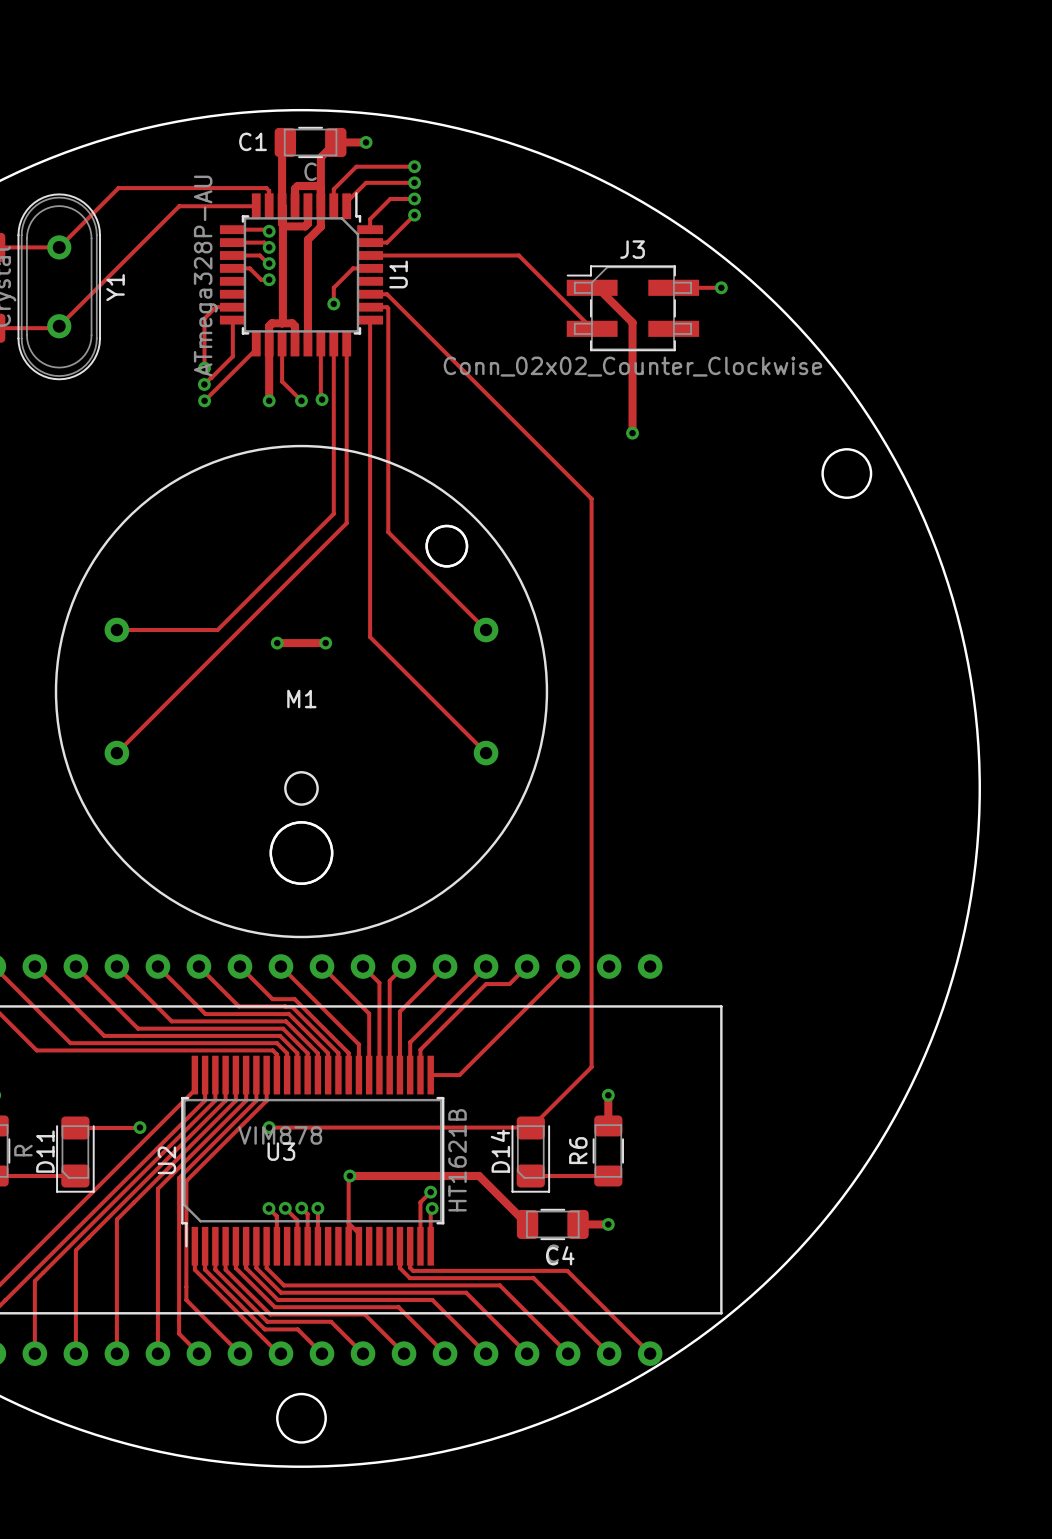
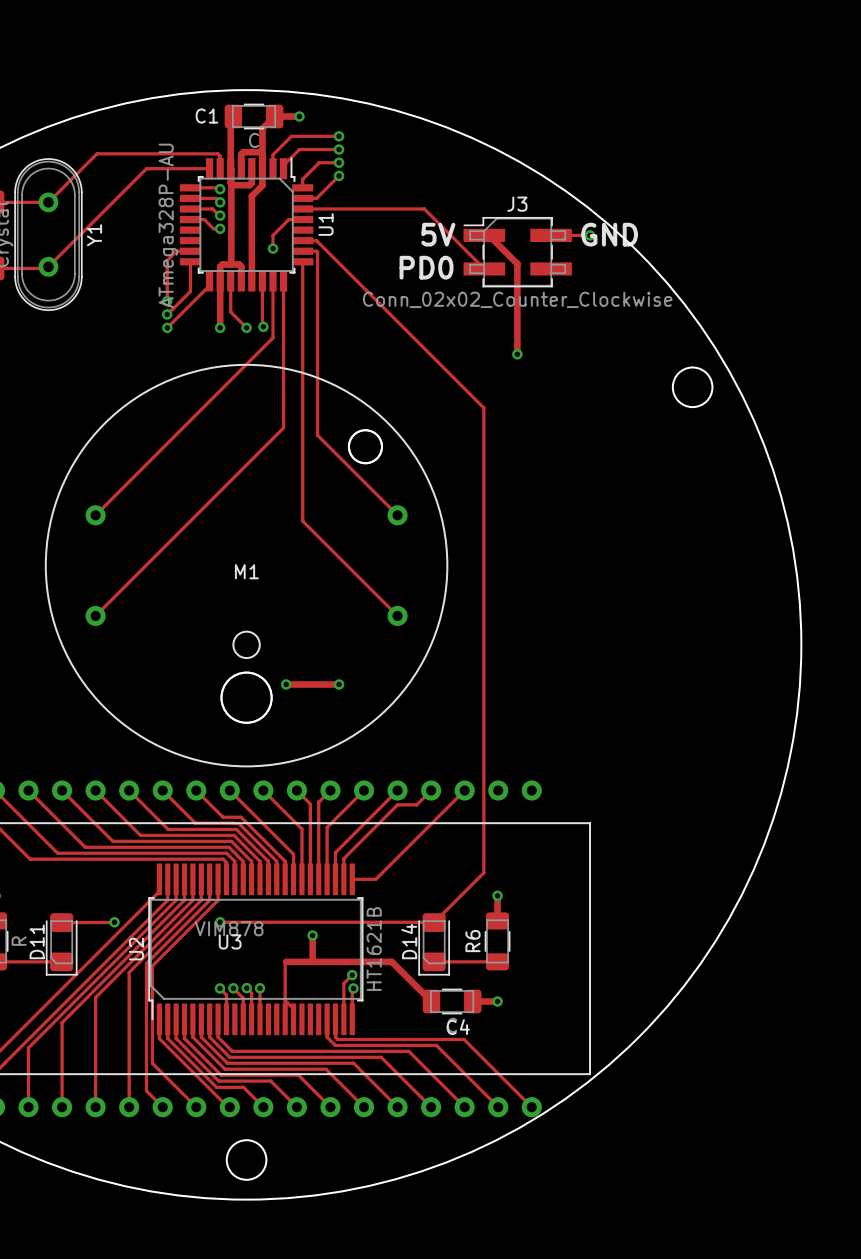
text: none -> 5V (438, 234)
text: none -> GND (609, 234)
text: none -> PD0 (426, 267)
track: (333, 413) (333, 513) (217, 630) (116, 630) -> (273, 337) (95, 515)
track: (277, 643) (325, 643) -> none
via: (277, 643) -> none
via: (325, 643) -> none
track: none -> (286, 684) (339, 684)
via: none -> (286, 684)
via: none -> (339, 684)
track: none -> (312, 935) (312, 961)
via position: (349, 1176) -> (312, 935)

